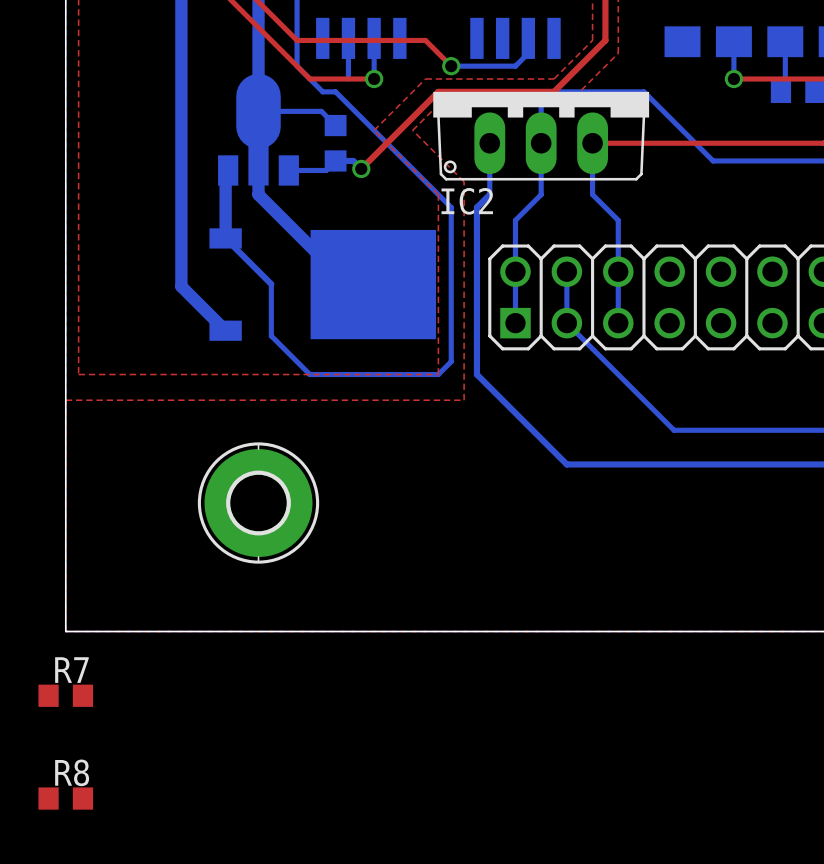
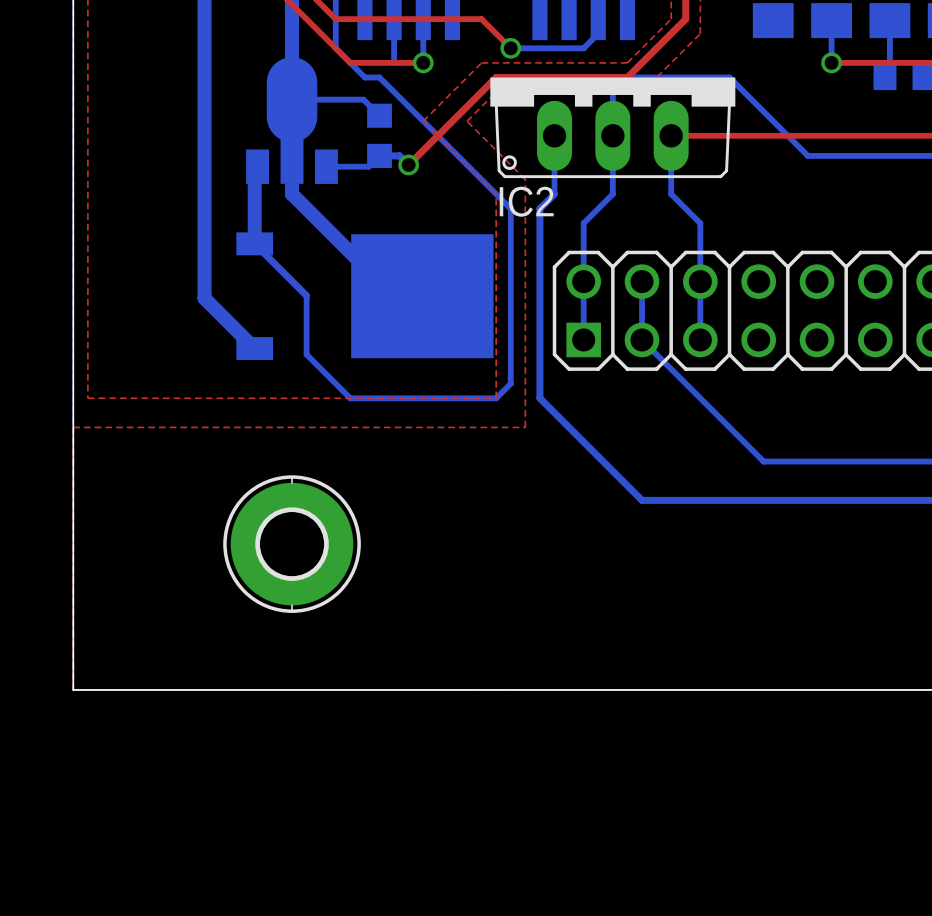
R7: (65, 695) -> none
R8: (65, 798) -> none

